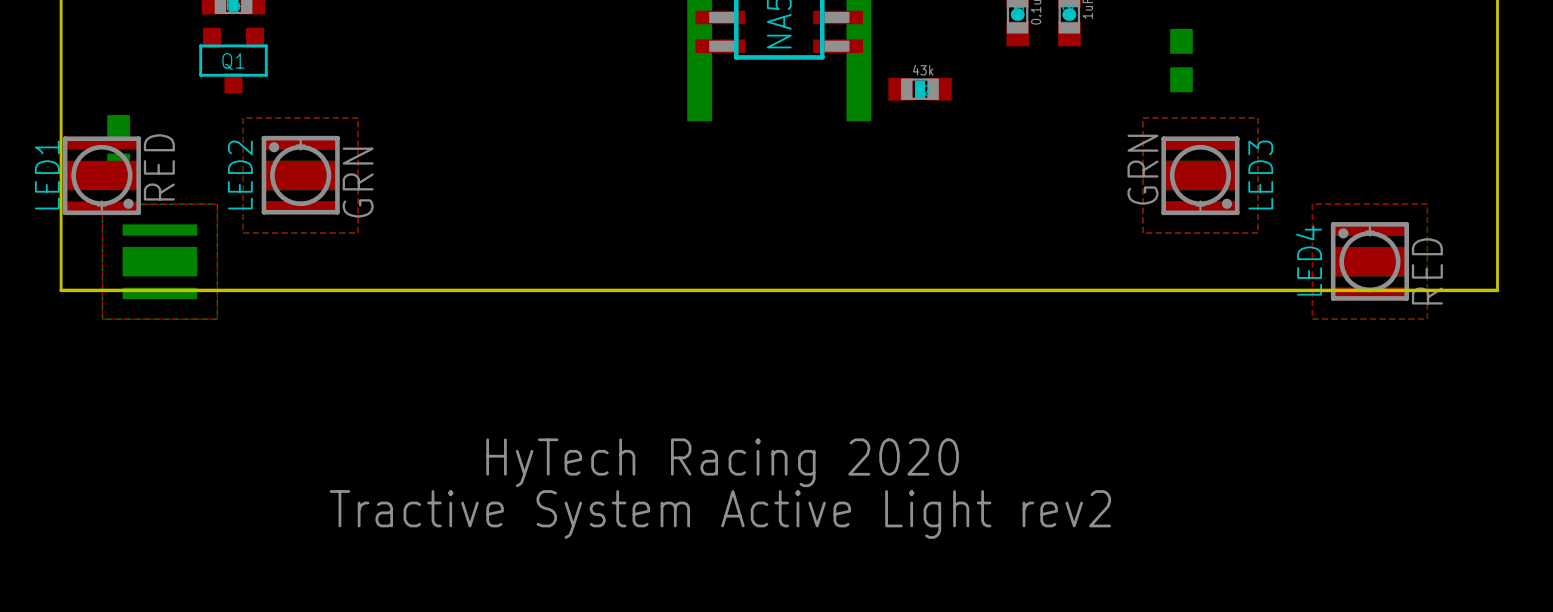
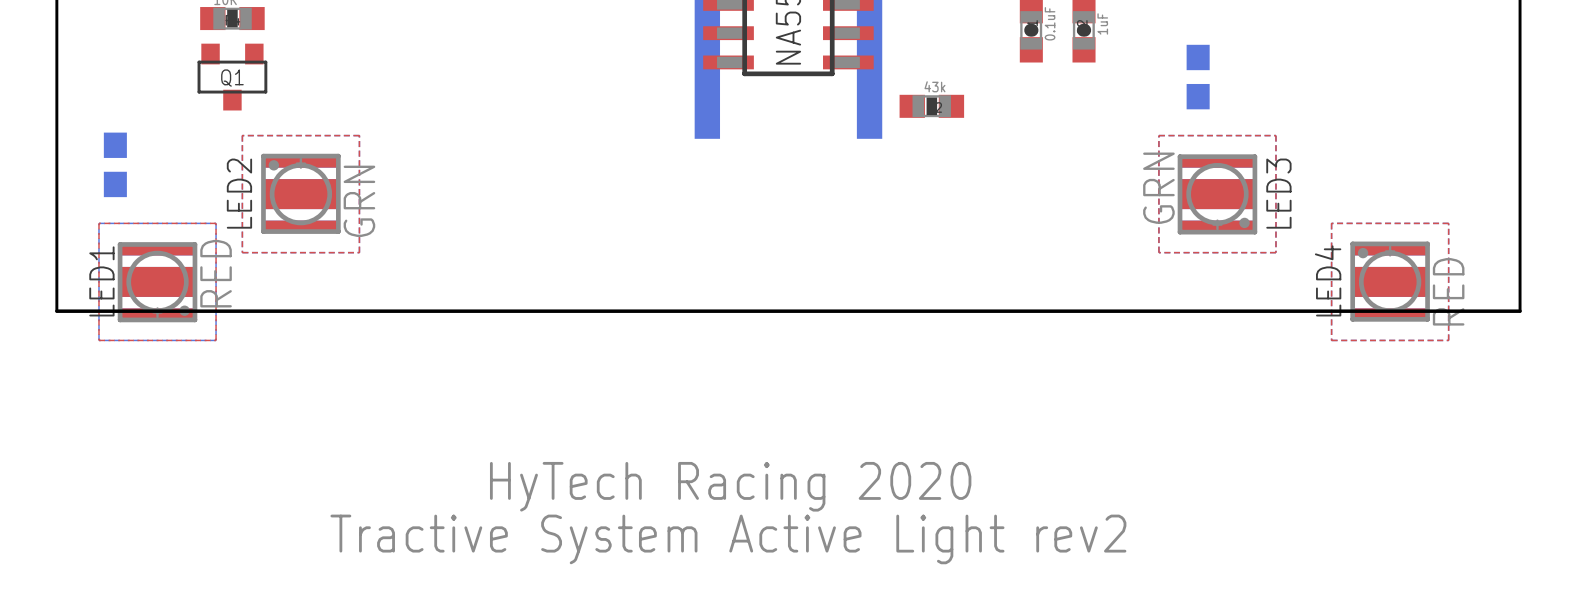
LED1 position: (101, 175) -> (157, 282)

